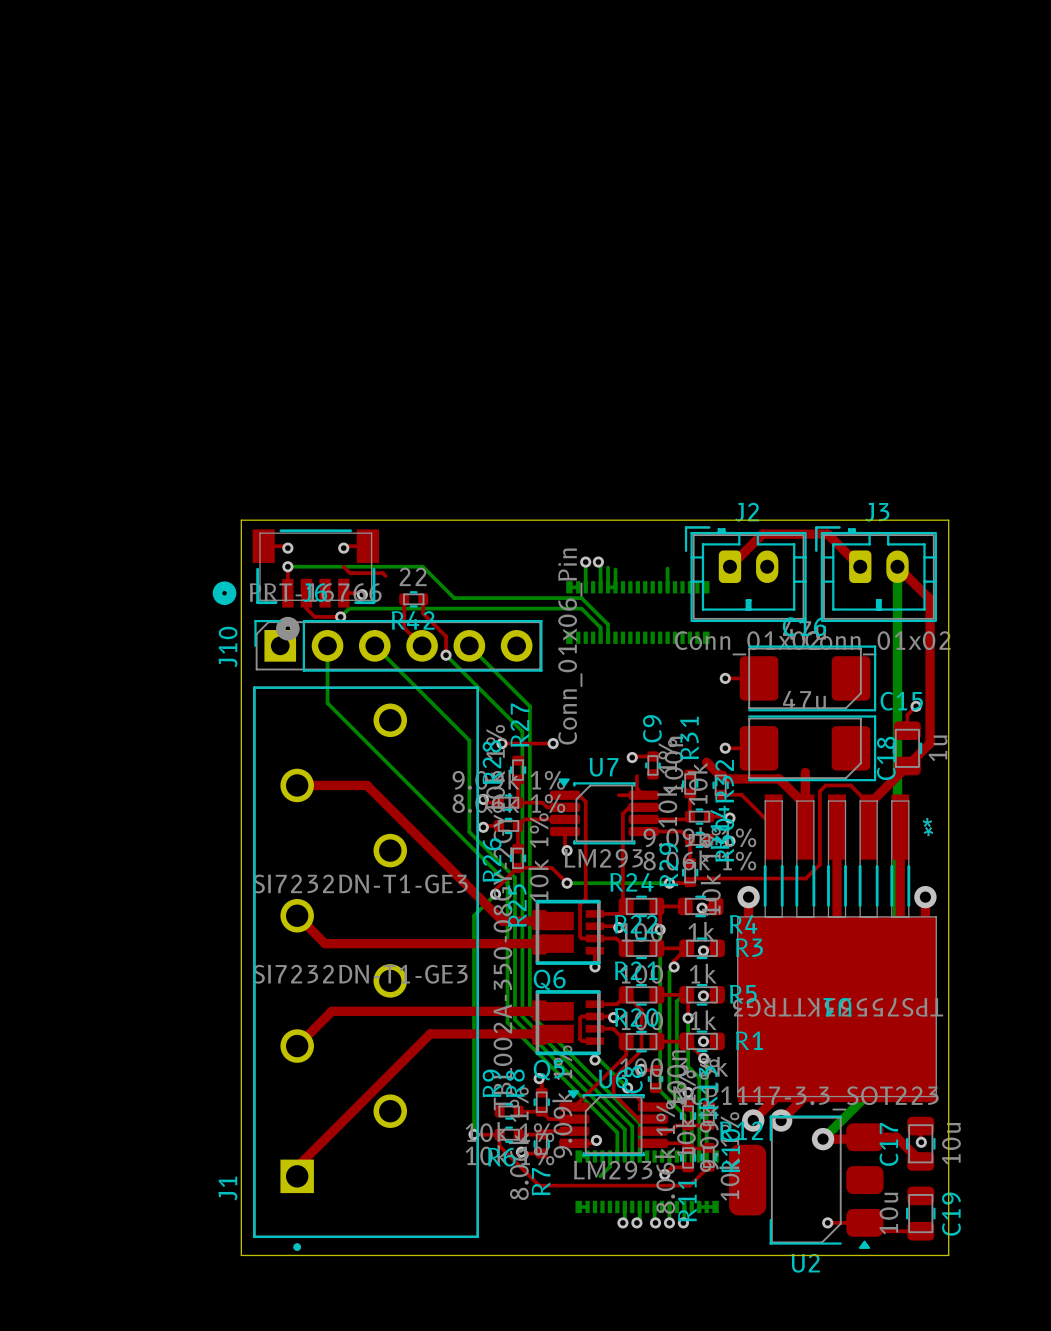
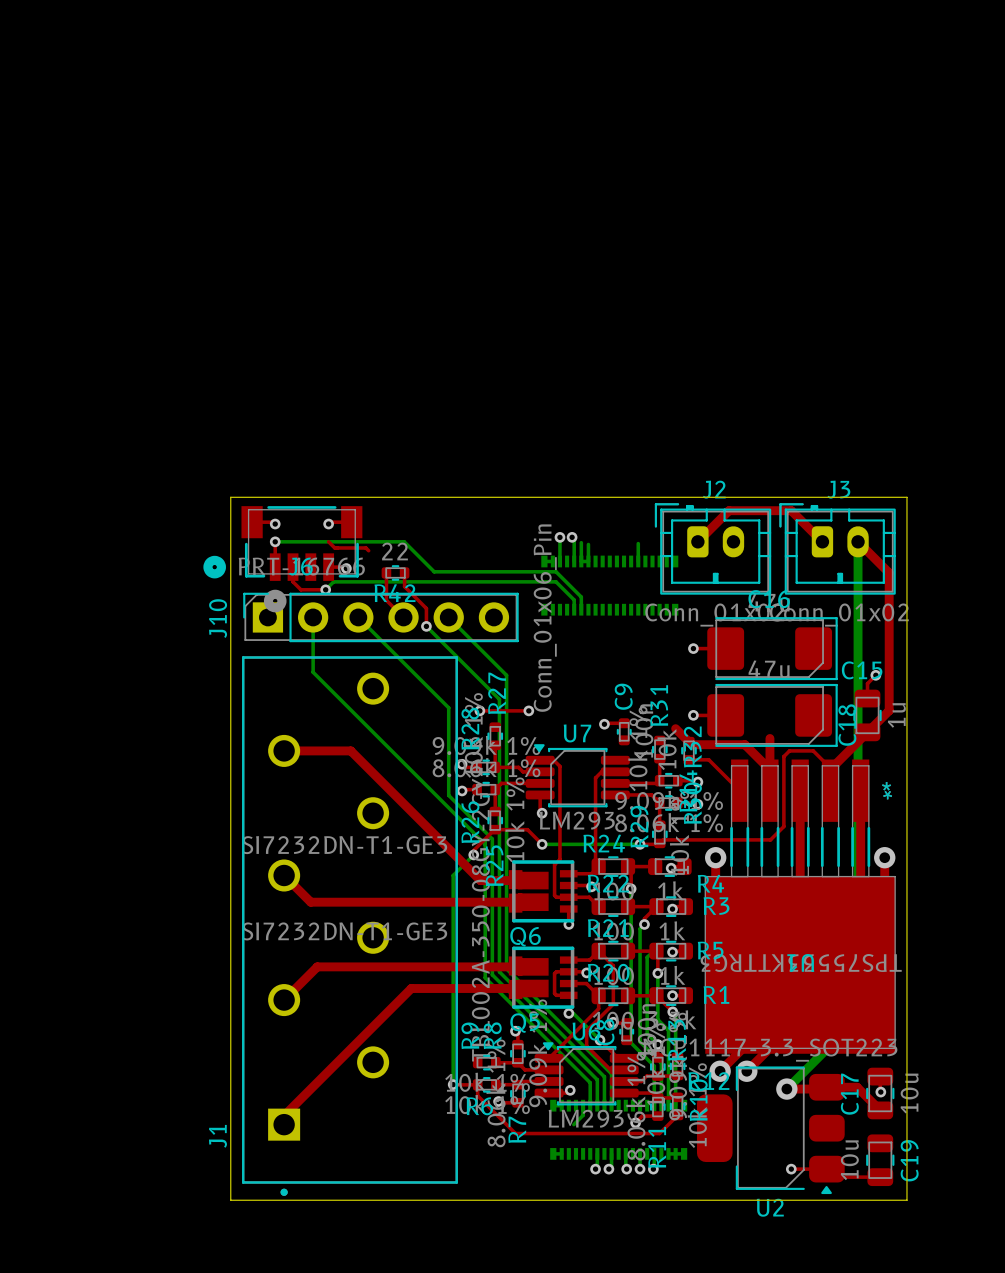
top track: (636, 776) (636, 788) (643, 795) (618, 795) -> none

